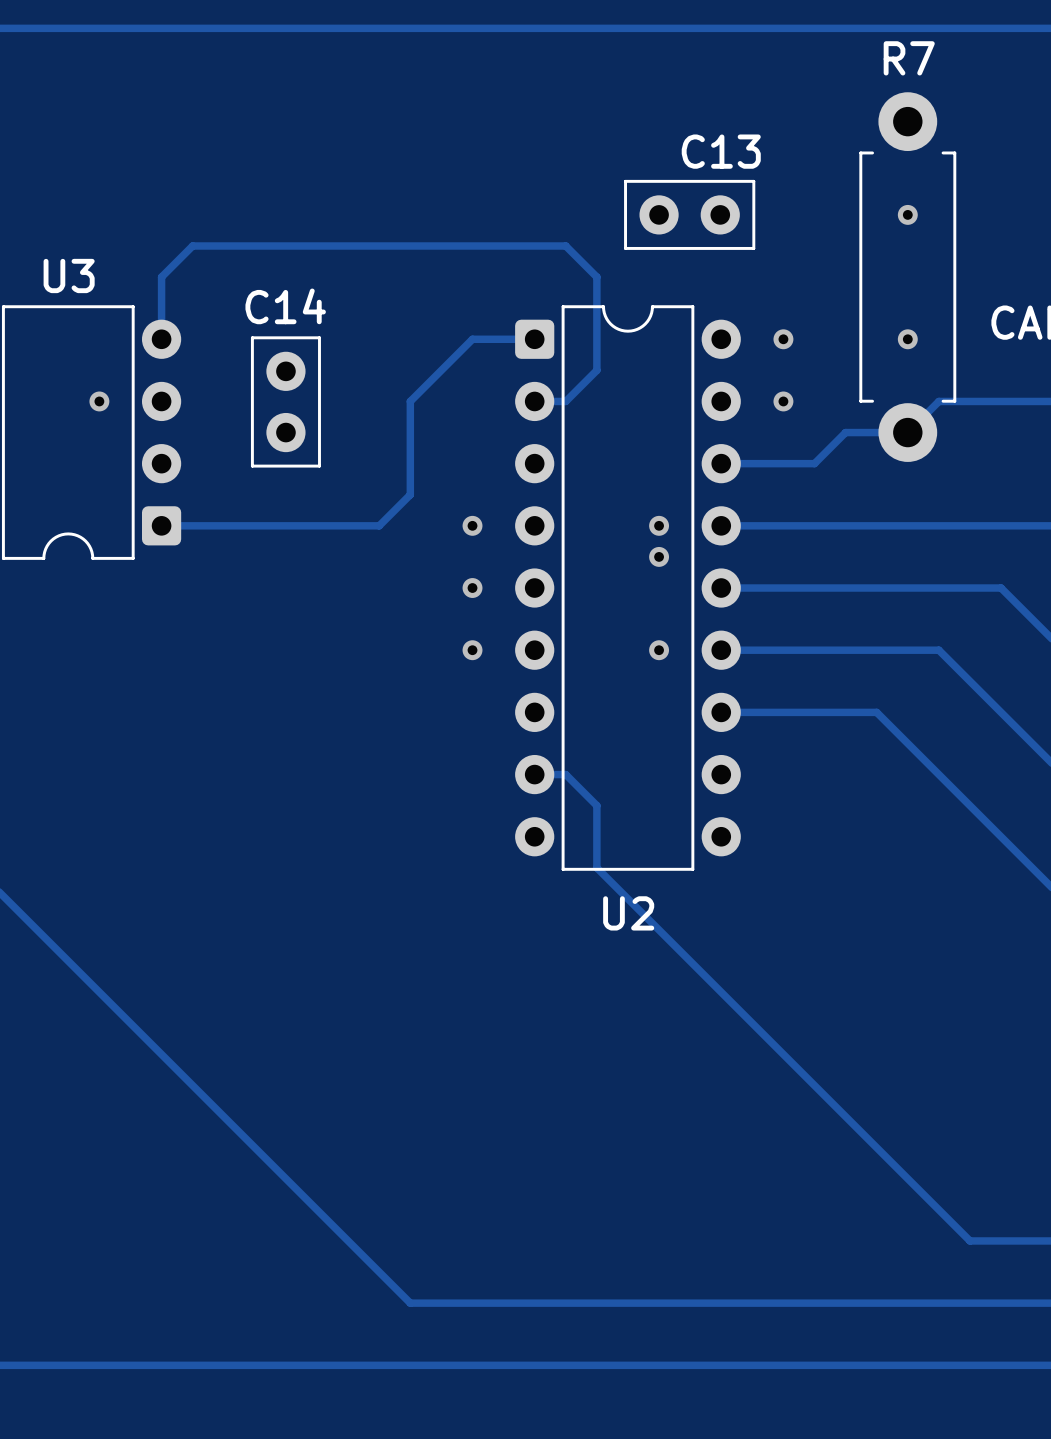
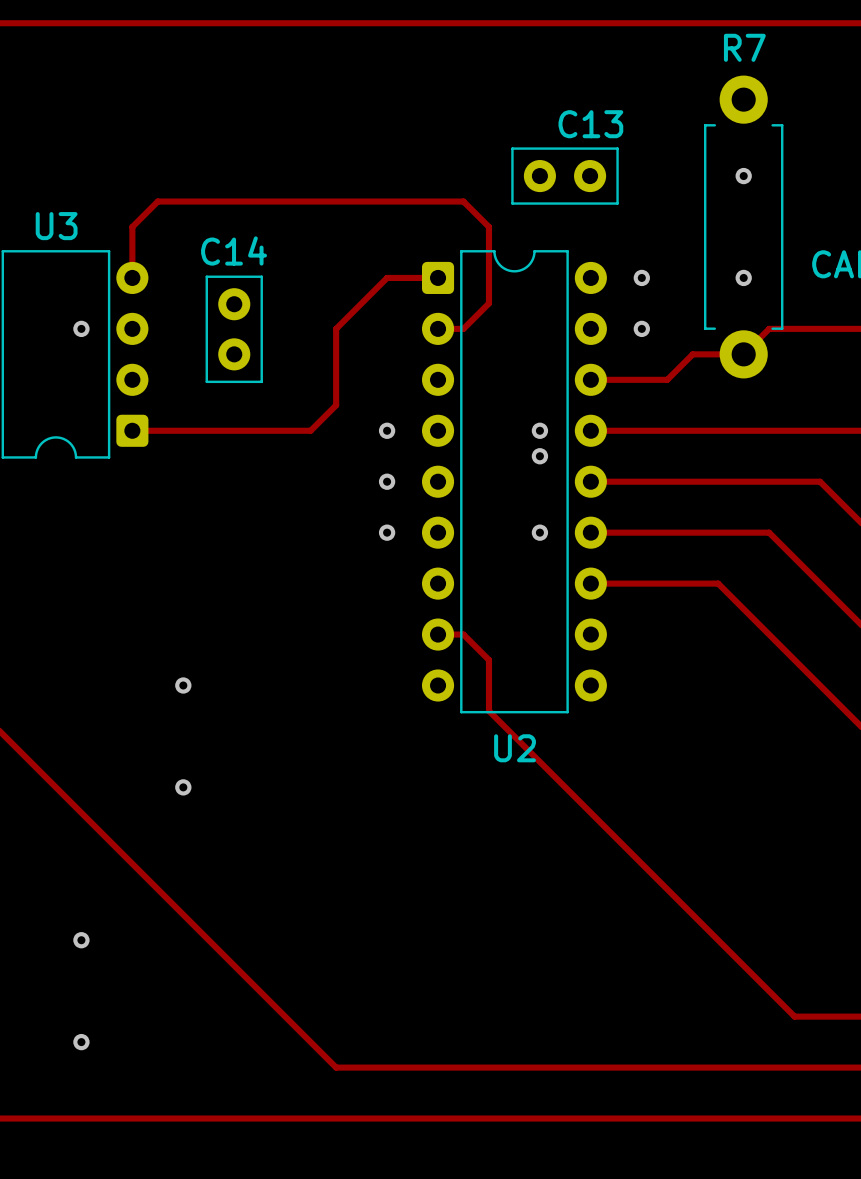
via: none -> (183, 685)
via: none -> (183, 787)
via: none -> (81, 940)
via: none -> (81, 1042)

